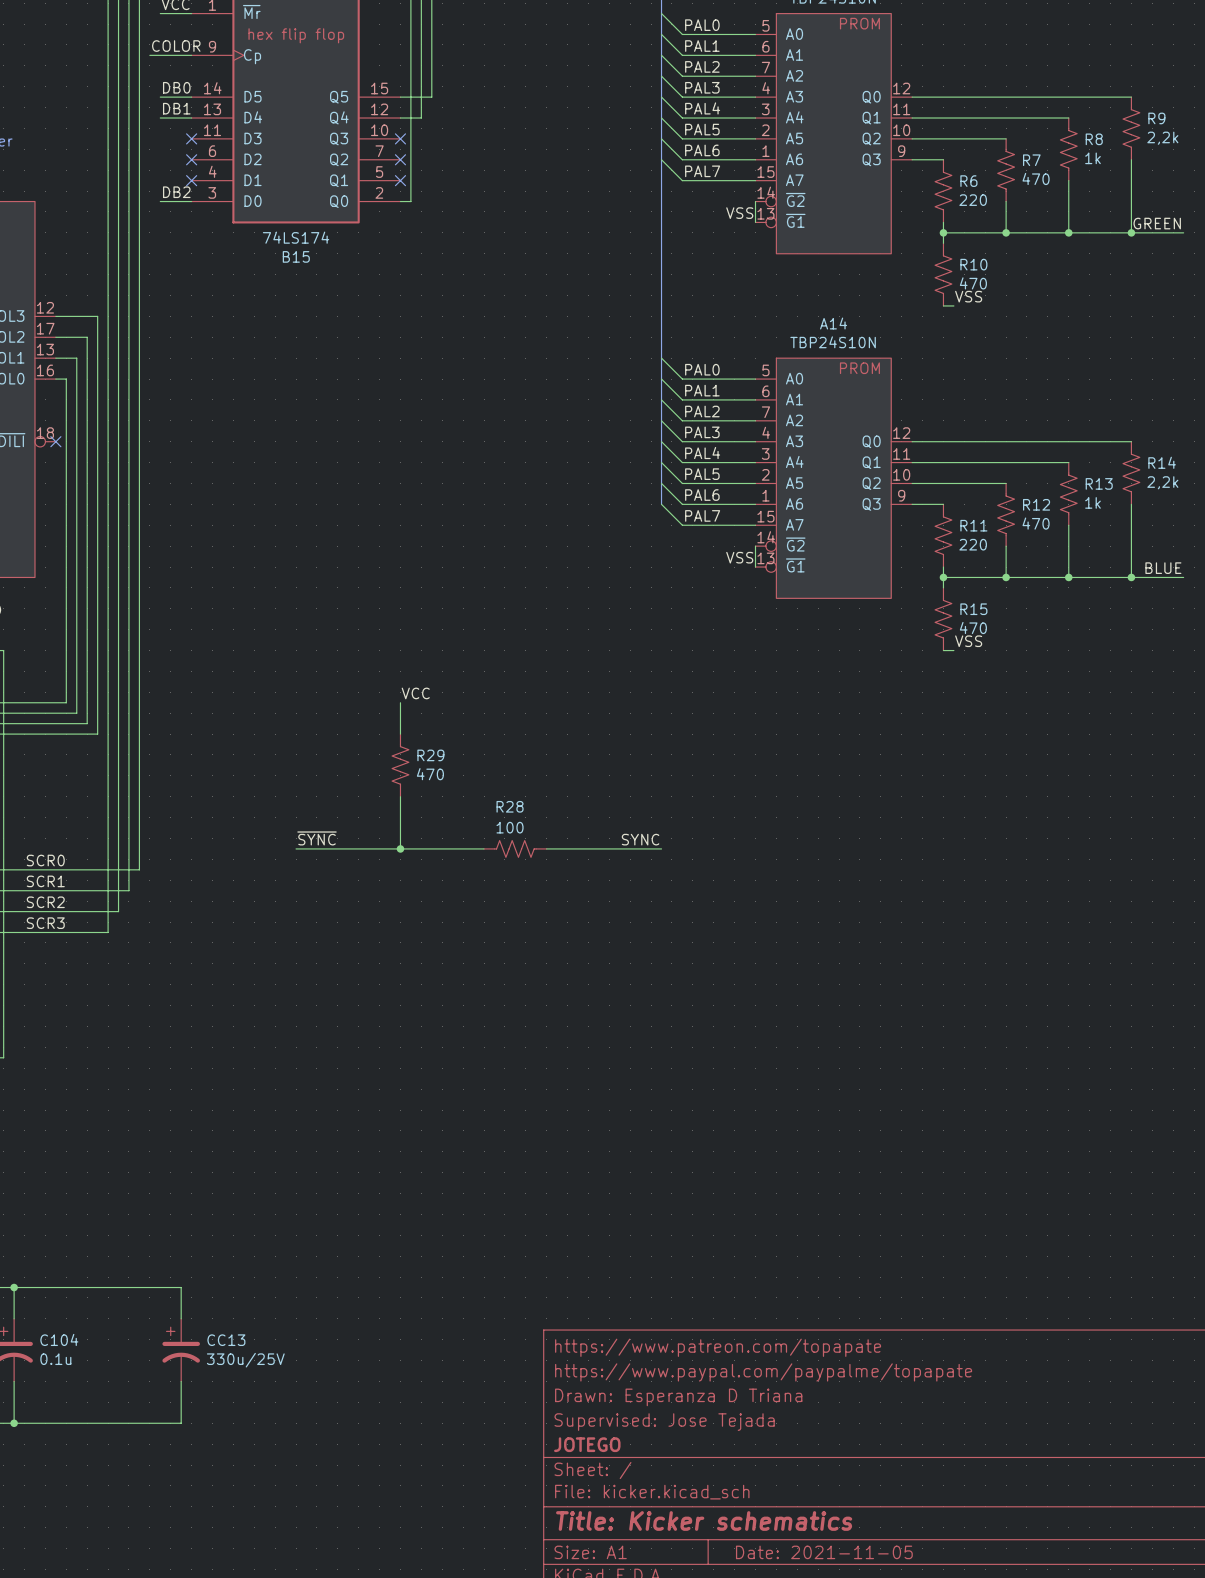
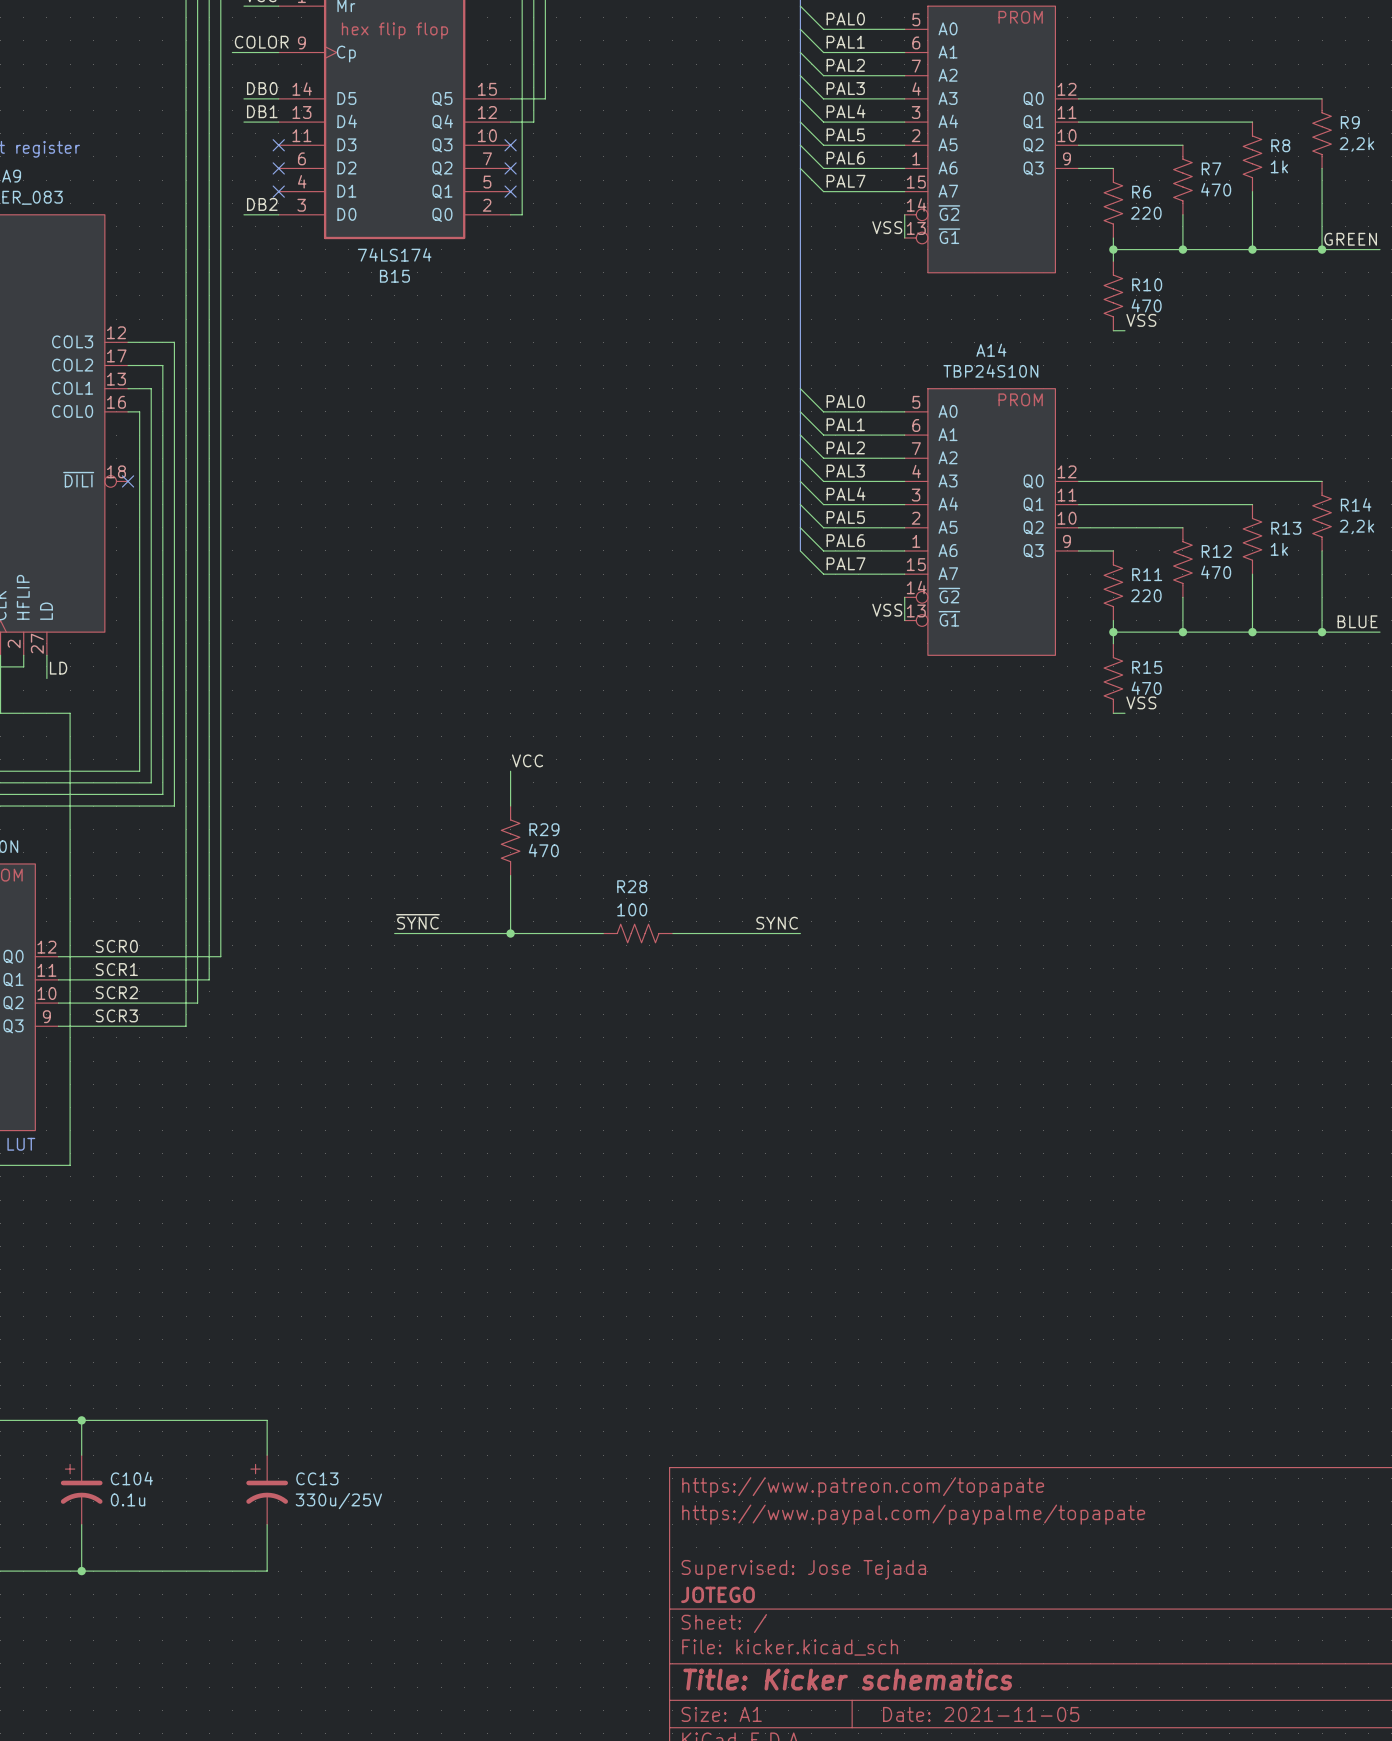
title block: Drawn: Esperanza D Triana (678, 1397) -> none

